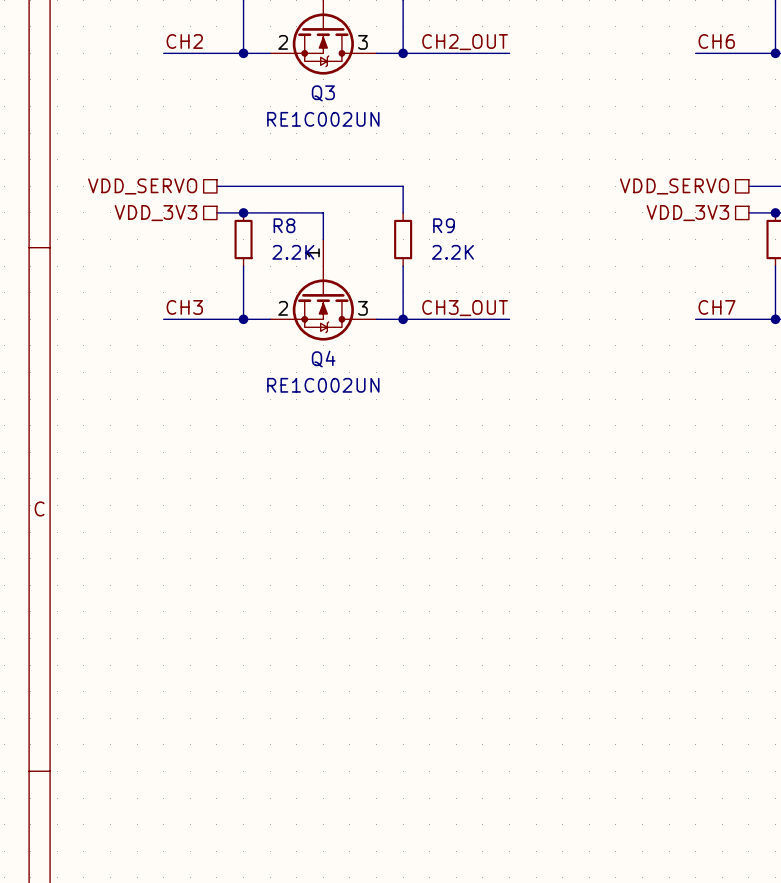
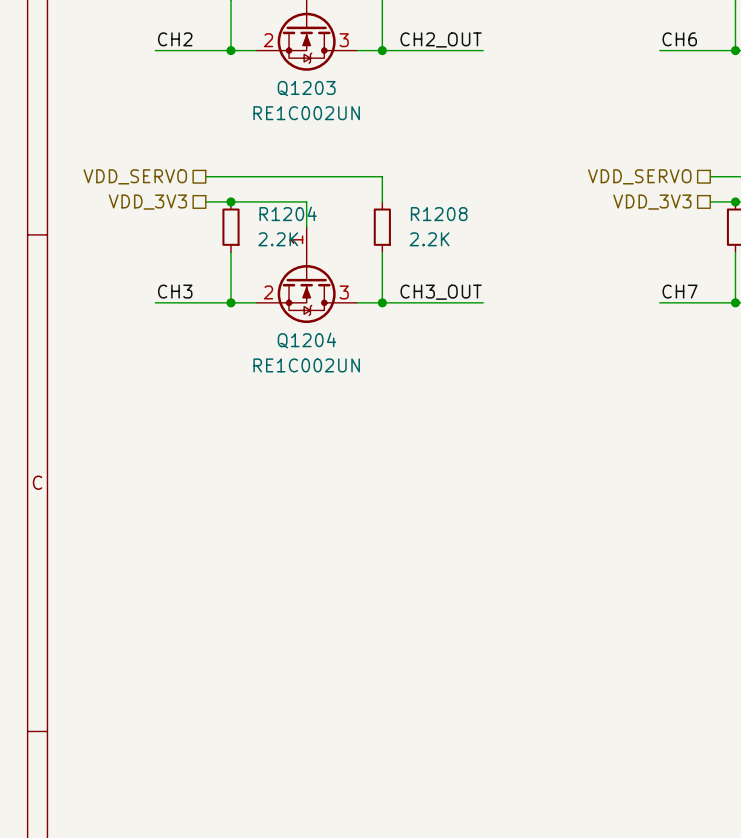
Q3 name: Q3 (323, 93) -> Q1203 (306, 88)
R8 name: R8 (284, 225) -> R1204 (288, 213)
R9 name: R9 (444, 225) -> R1208 (439, 214)
Q4 name: Q4 (323, 359) -> Q1204 (306, 340)

